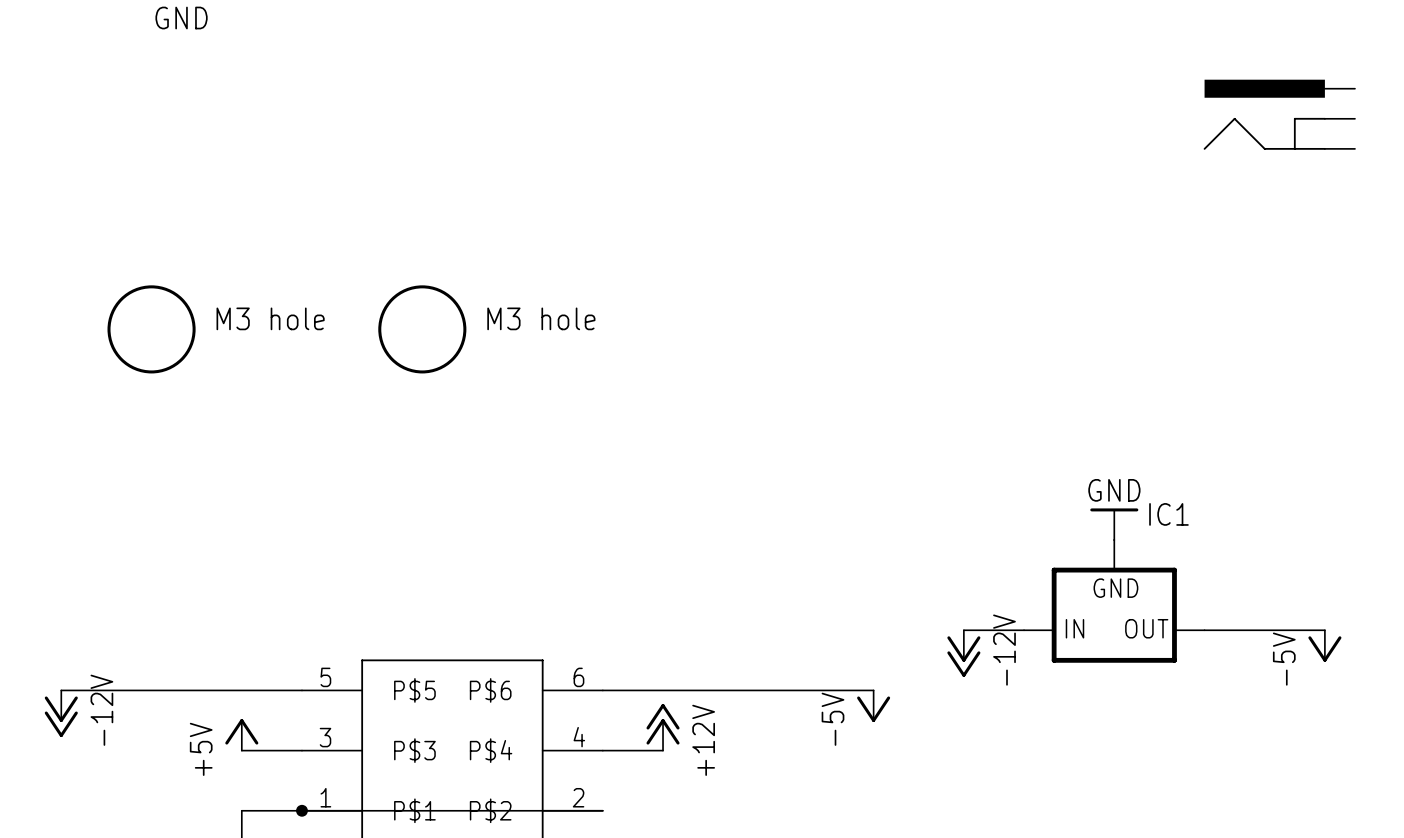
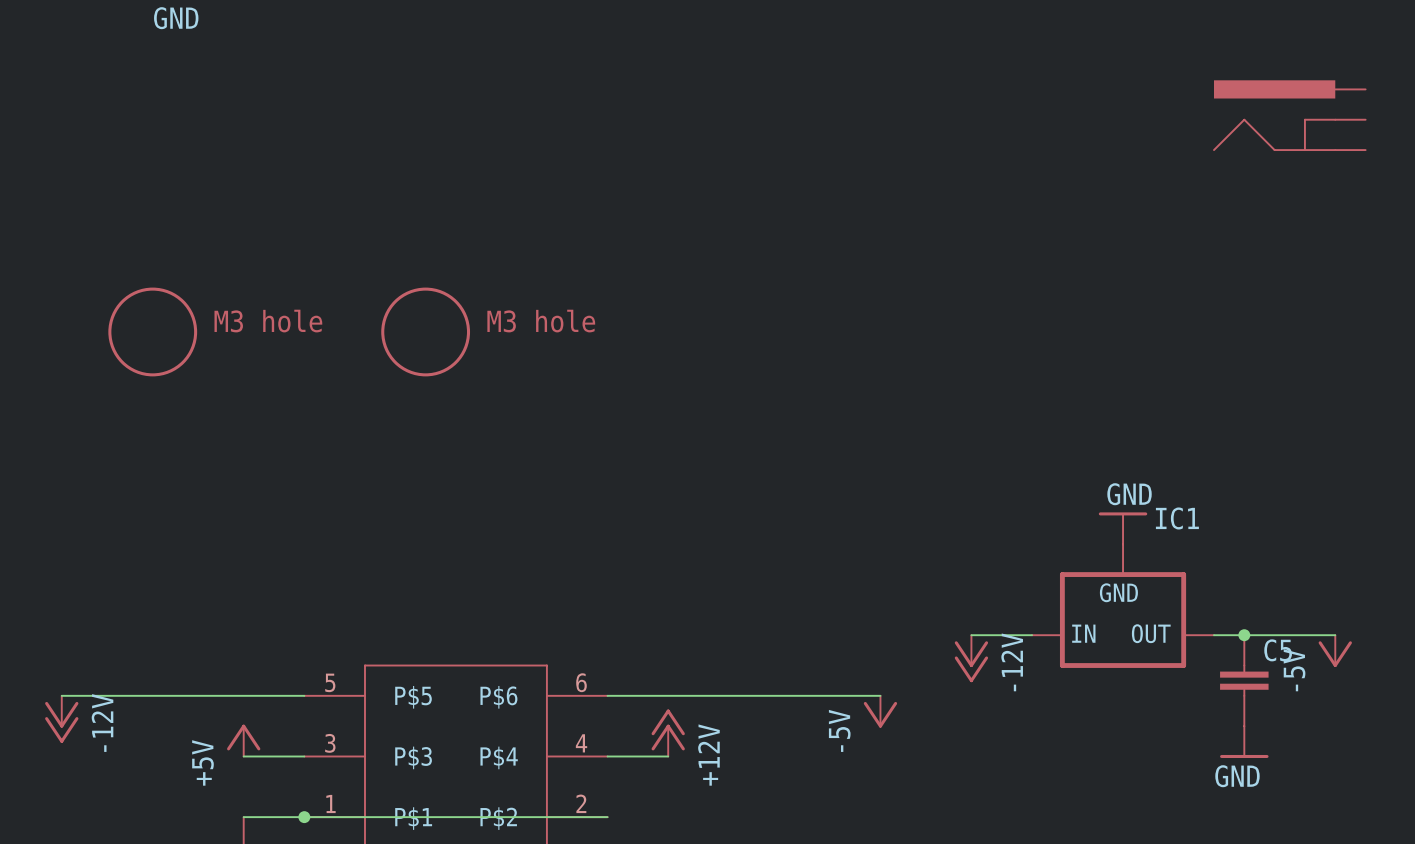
junction: none -> (1244, 635)
C5: none -> (1244, 680)
power symbol: none -> GND (1244, 742)

